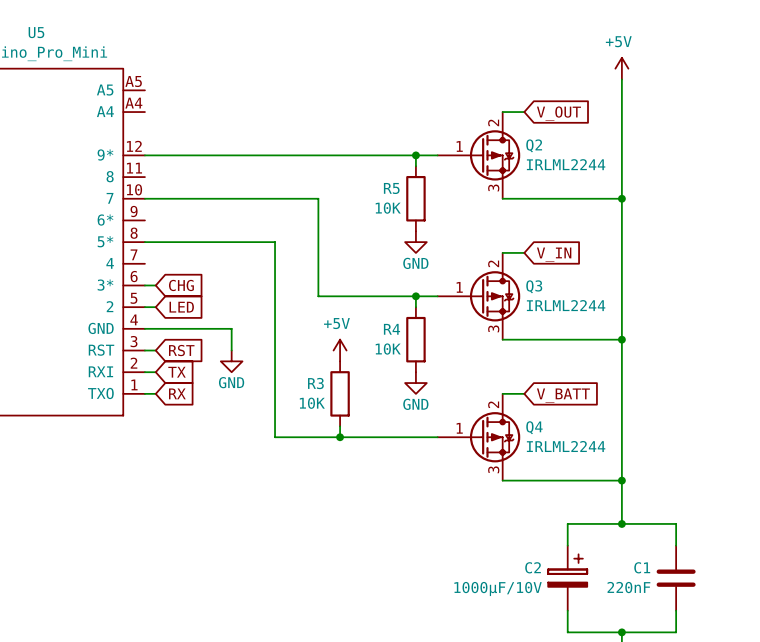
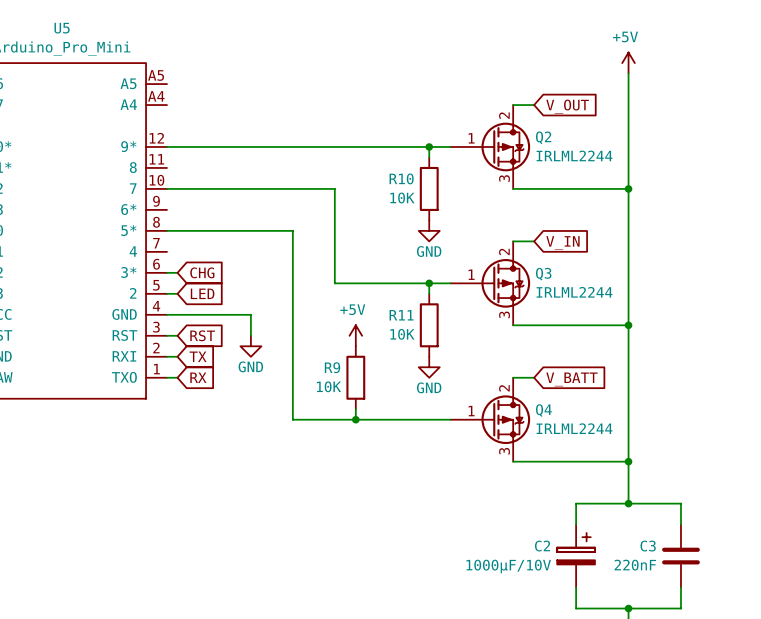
R5 name: R5 (391, 188) -> R10 (401, 178)
R4 name: R4 (391, 329) -> R11 (401, 315)
R3 name: R3 (315, 383) -> R9 (332, 367)
C1 name: C1 (642, 567) -> C3 (648, 546)

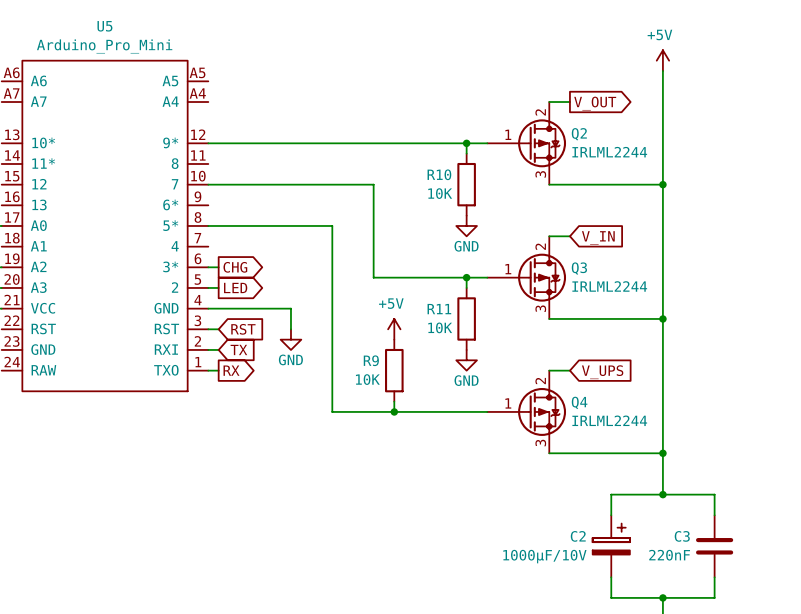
global label shape: input (567, 106) -> output (595, 103)
global label shape: input (202, 272) -> output (235, 267)
global label shape: input (202, 293) -> output (235, 287)
global label shape: input (198, 377) -> output (231, 370)
global label: V_BATT (571, 379) -> V_UPS (602, 372)

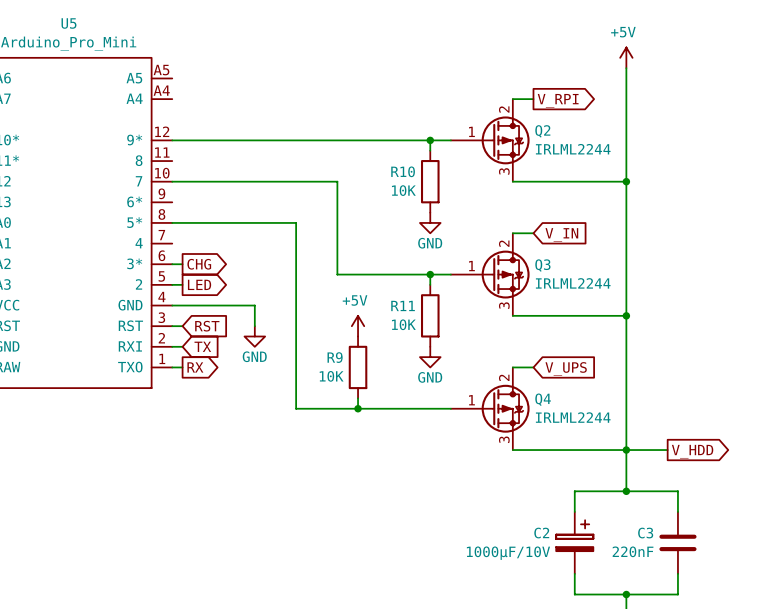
global label: V_OUT (595, 103) -> V_RPI (558, 100)
wire: none -> (626, 450) (667, 450)
global label: none -> V_HDD (692, 451)

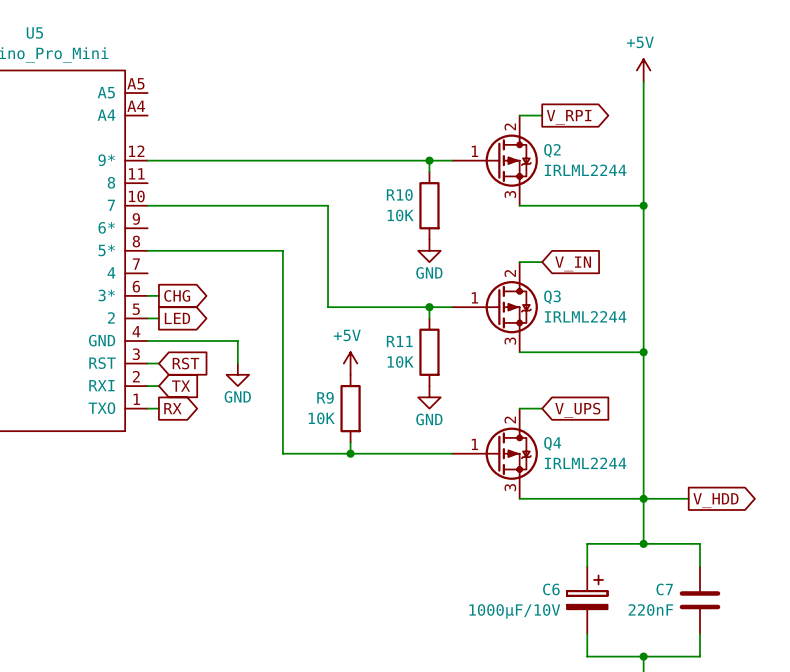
C2 name: C2 (541, 533) -> C6 (551, 589)
C3 name: C3 (645, 533) -> C7 (664, 589)

